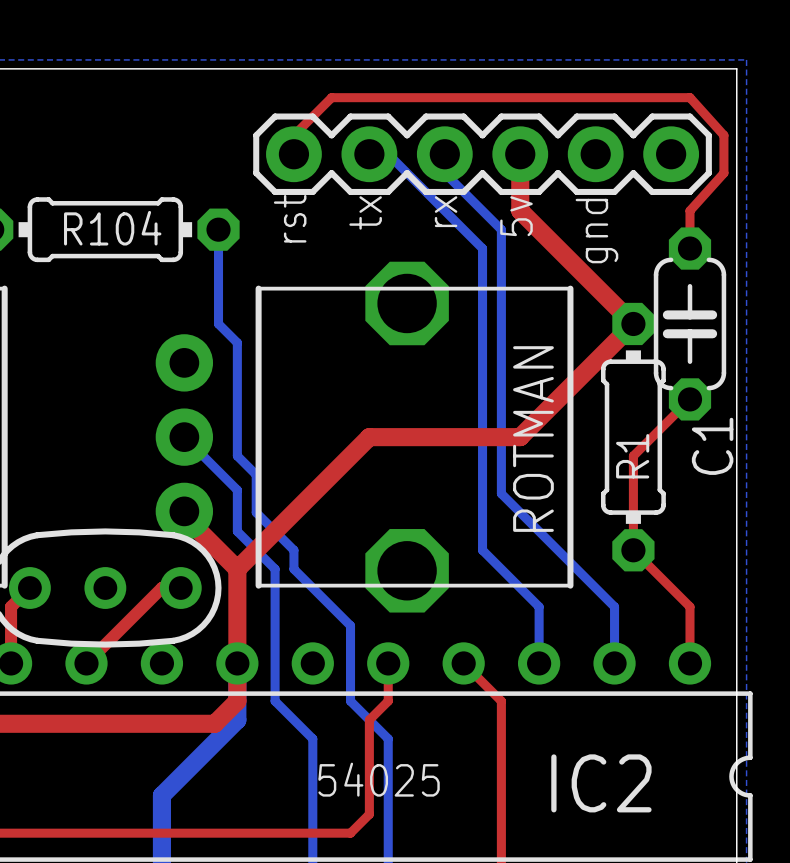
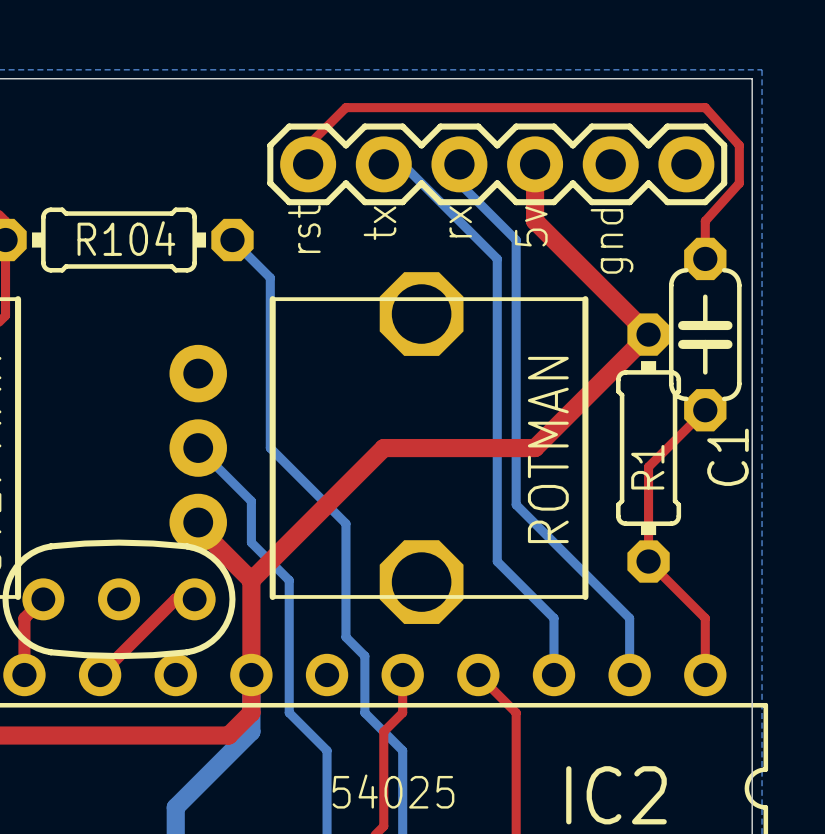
bottom track: (218, 229) (218, 323) (237, 342) (237, 455) (256, 474) (256, 512) (293, 550) (293, 569) (350, 625) (350, 644) -> (232, 240) (270, 277) (270, 448) (345, 523) (345, 637) (364, 656)

